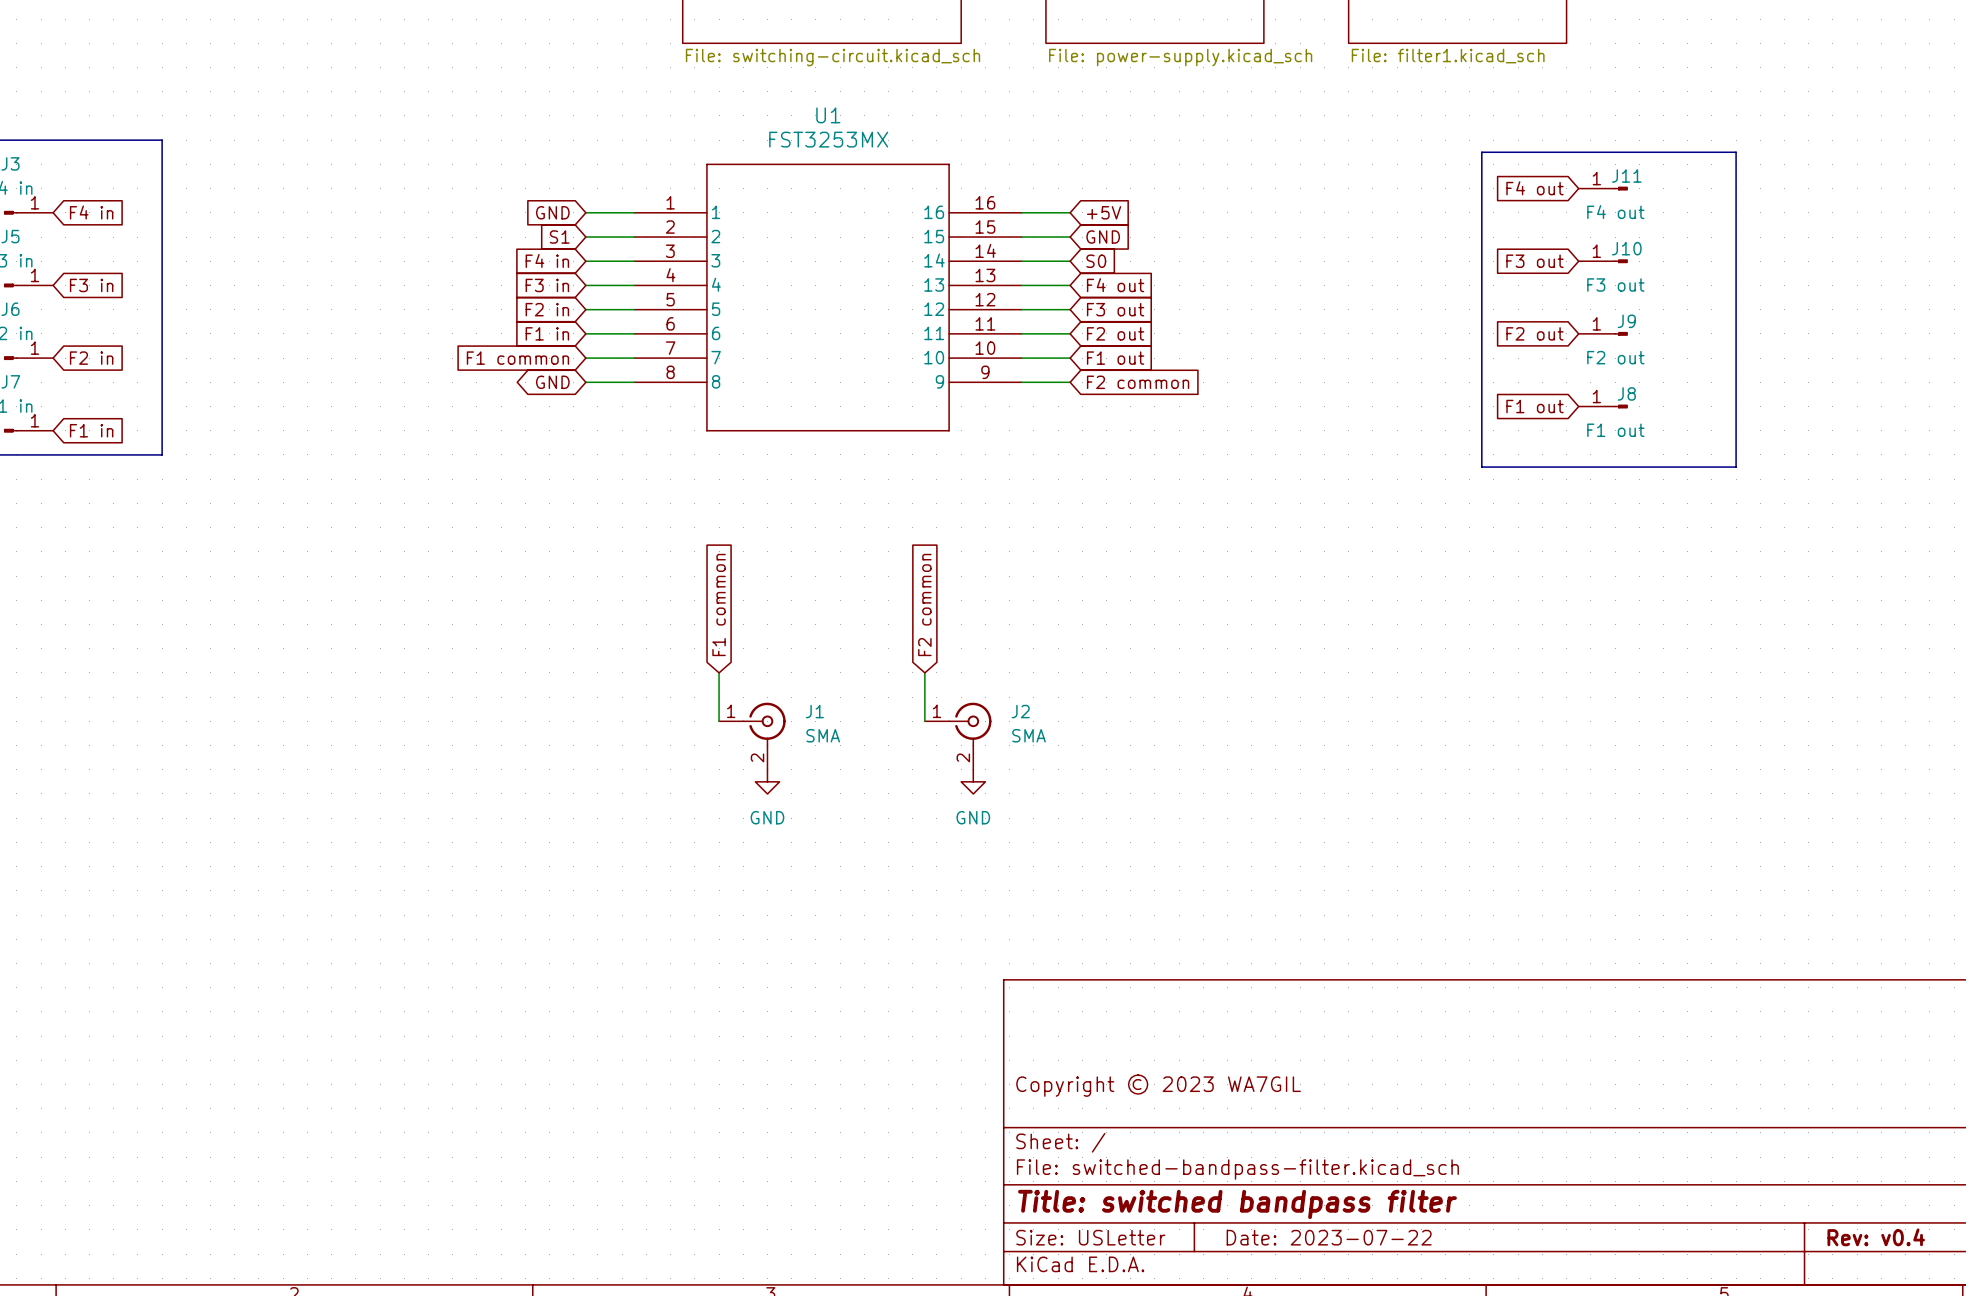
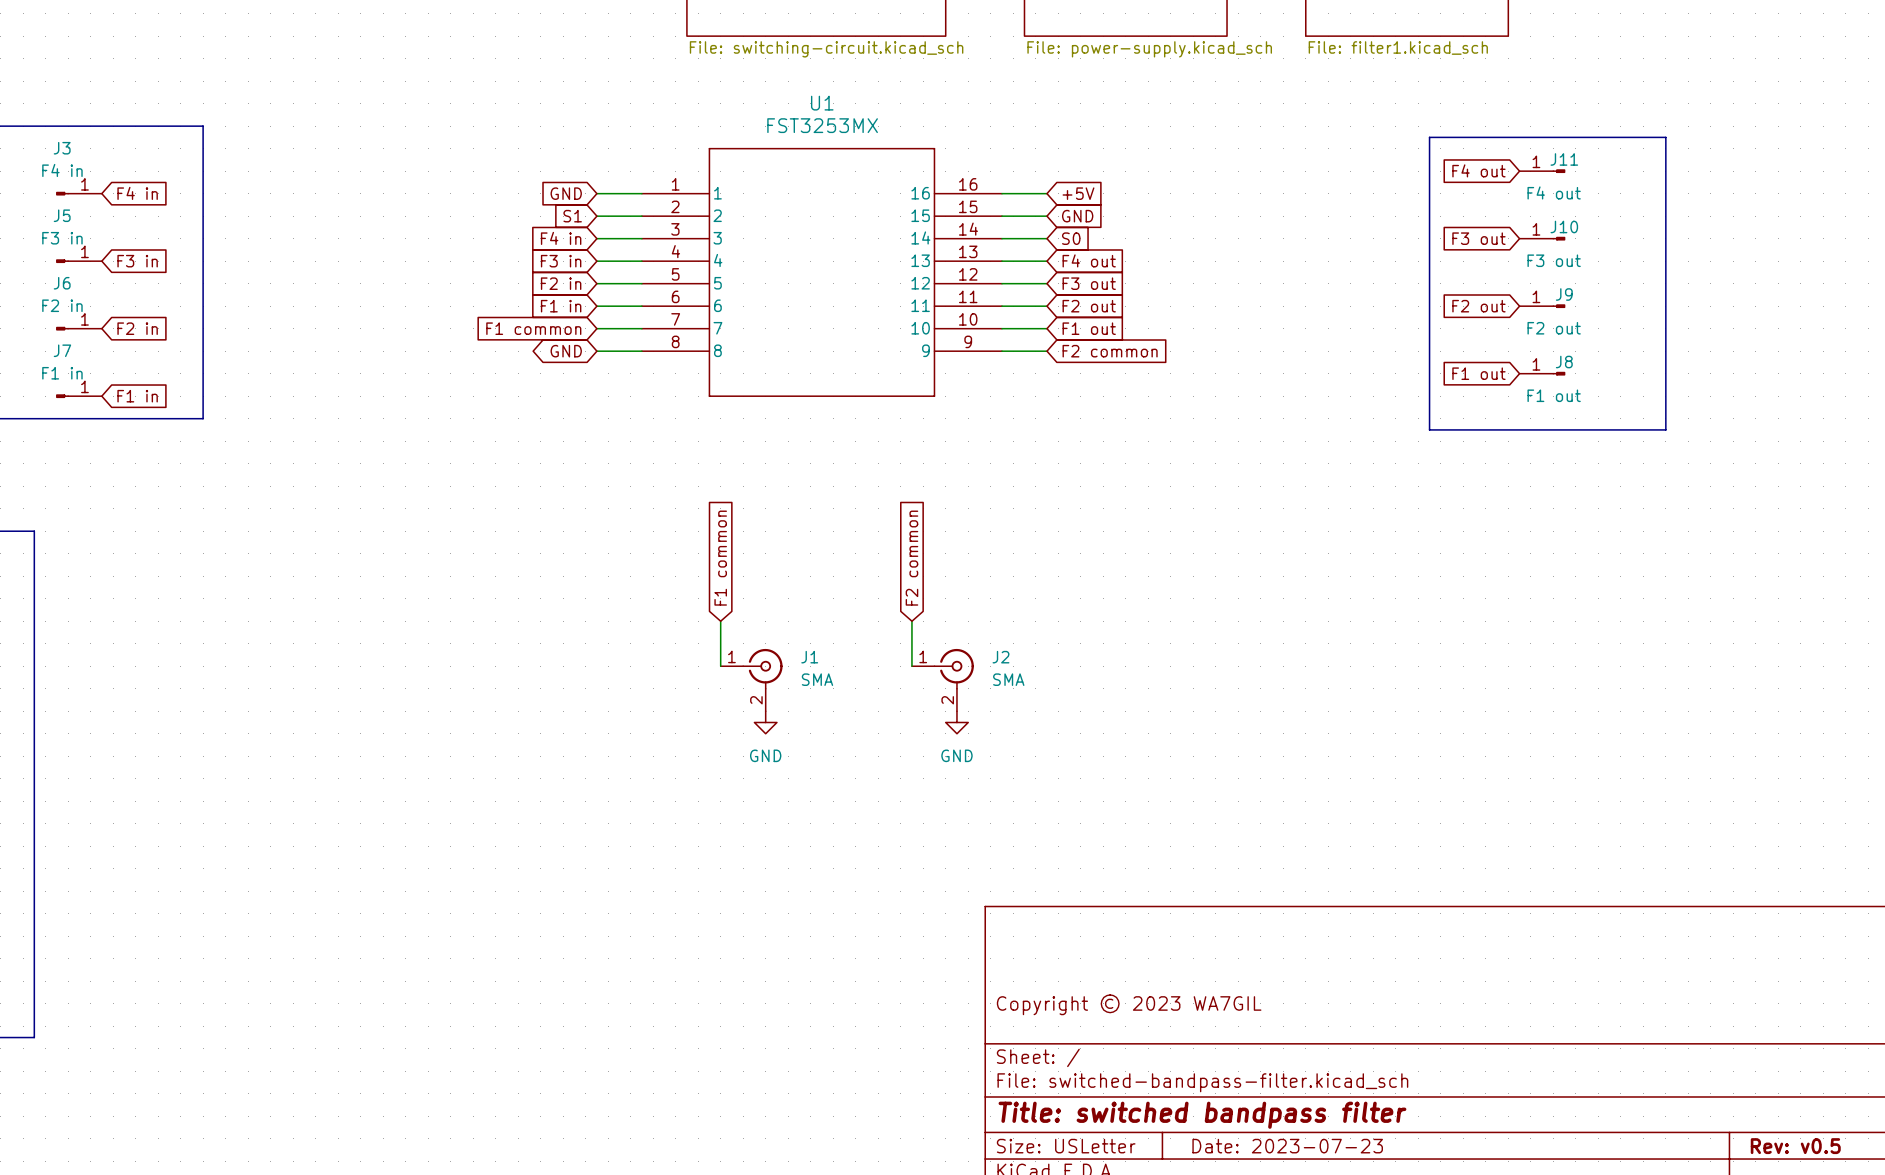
title block: Date: 2023-07-22 (1329, 1237) -> Date: 2023-07-23 (1287, 1146)
title block: Rev: v0.4 (1876, 1237) -> Rev: v0.5 (1795, 1146)

